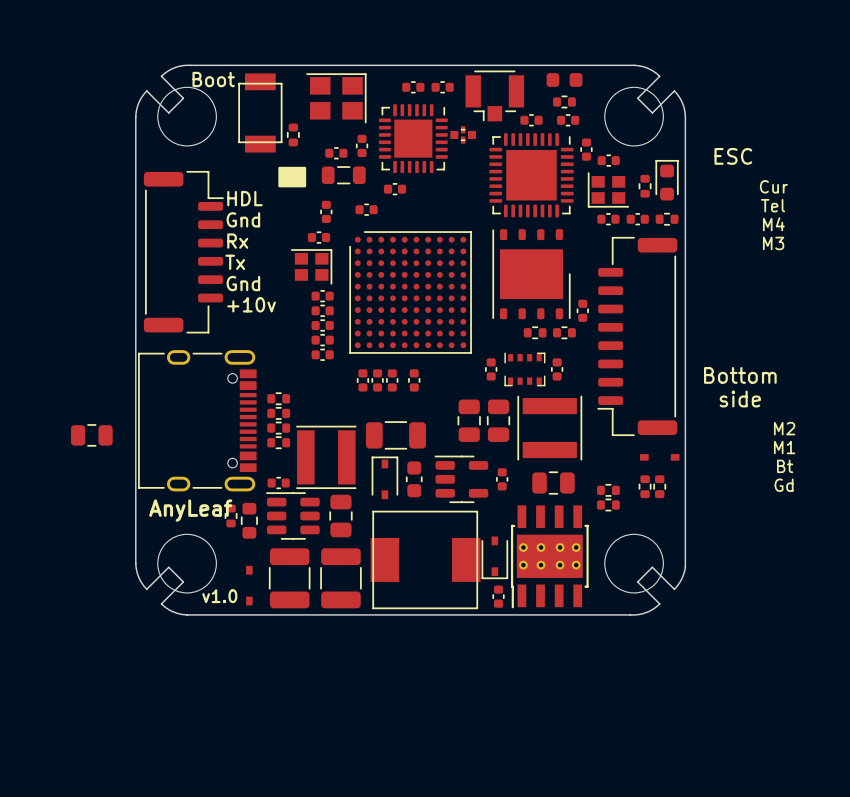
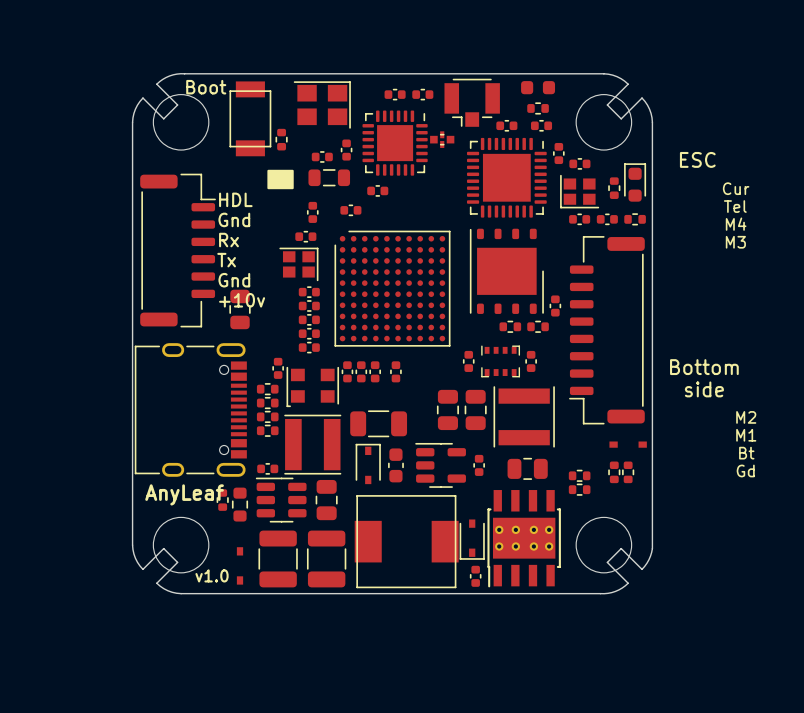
part: none -> (278, 368)
part: none -> (312, 386)
part rotation: 0° (91, 435) -> 90° clockwise (240, 309)
part position: (91, 435) -> (240, 309)

